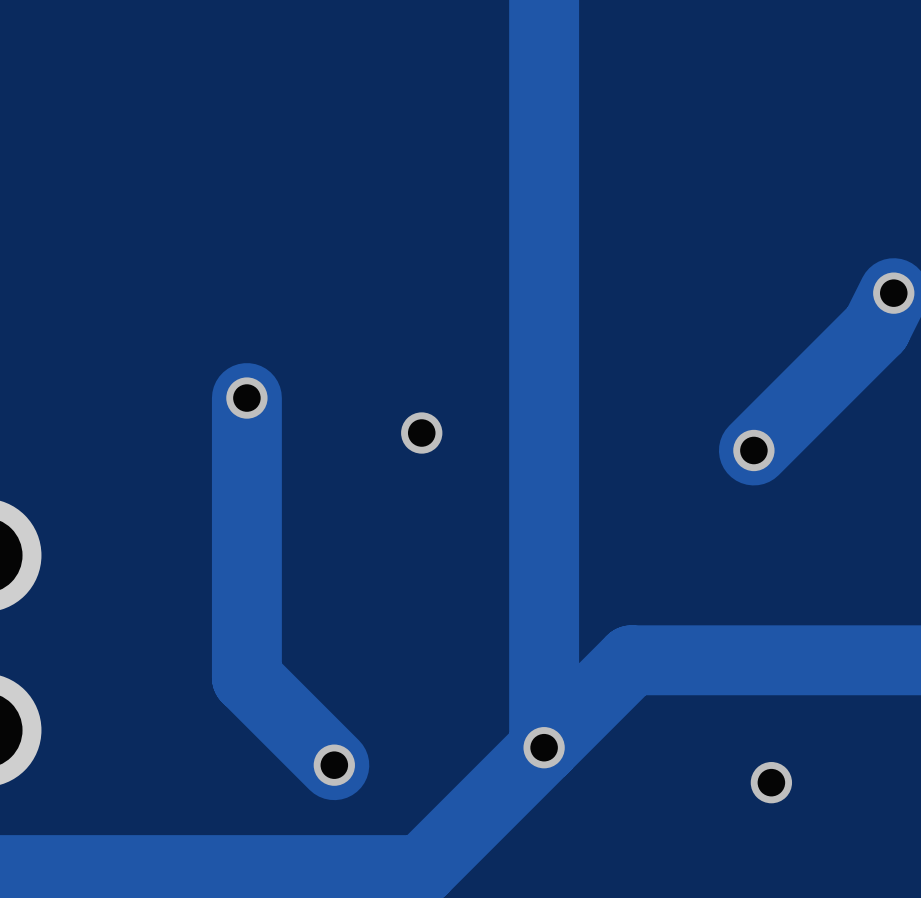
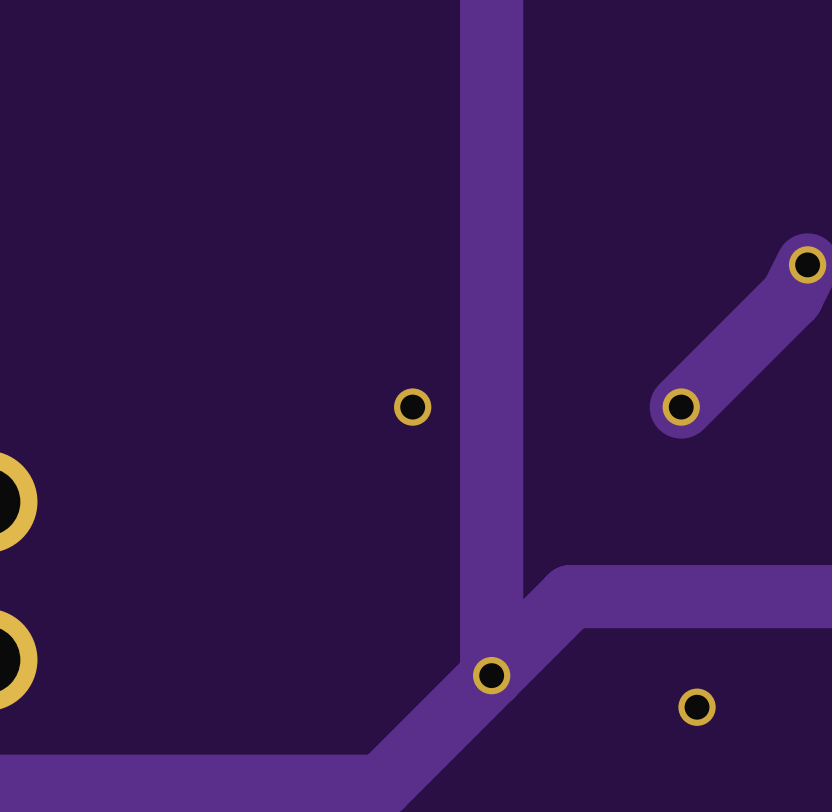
track: (246, 398) (246, 677) (334, 765) -> none
via: (246, 398) -> none
via position: (421, 433) -> (412, 407)
via: (334, 765) -> none

